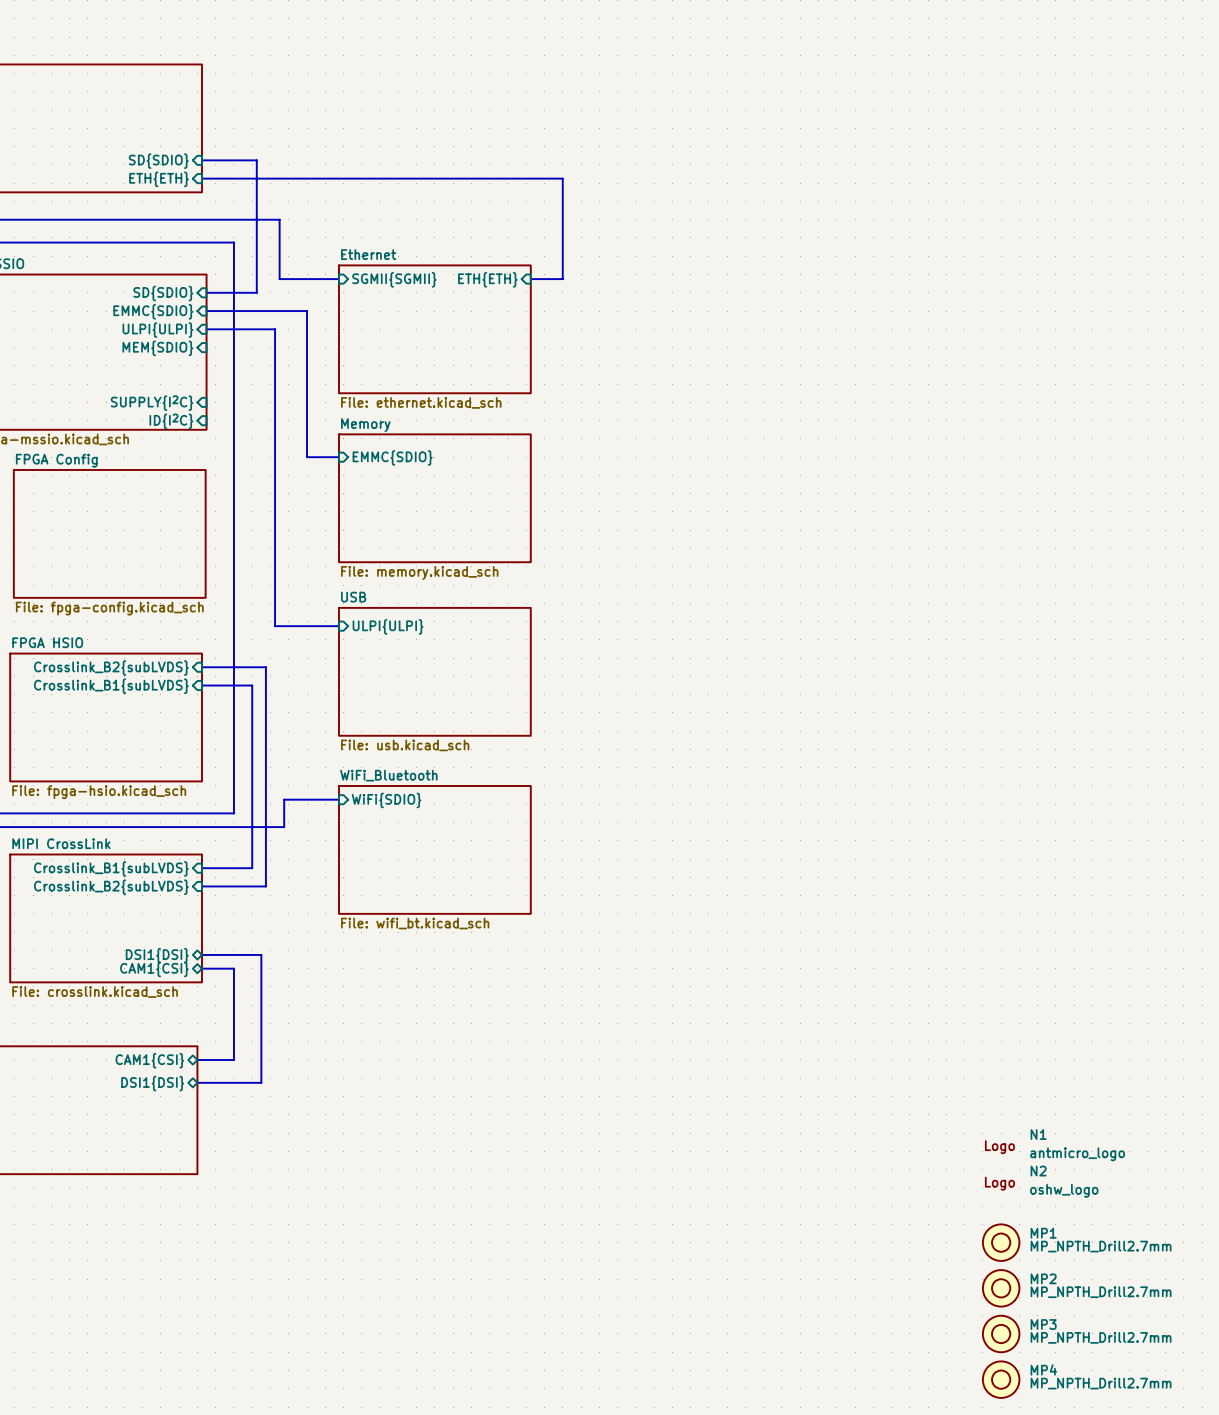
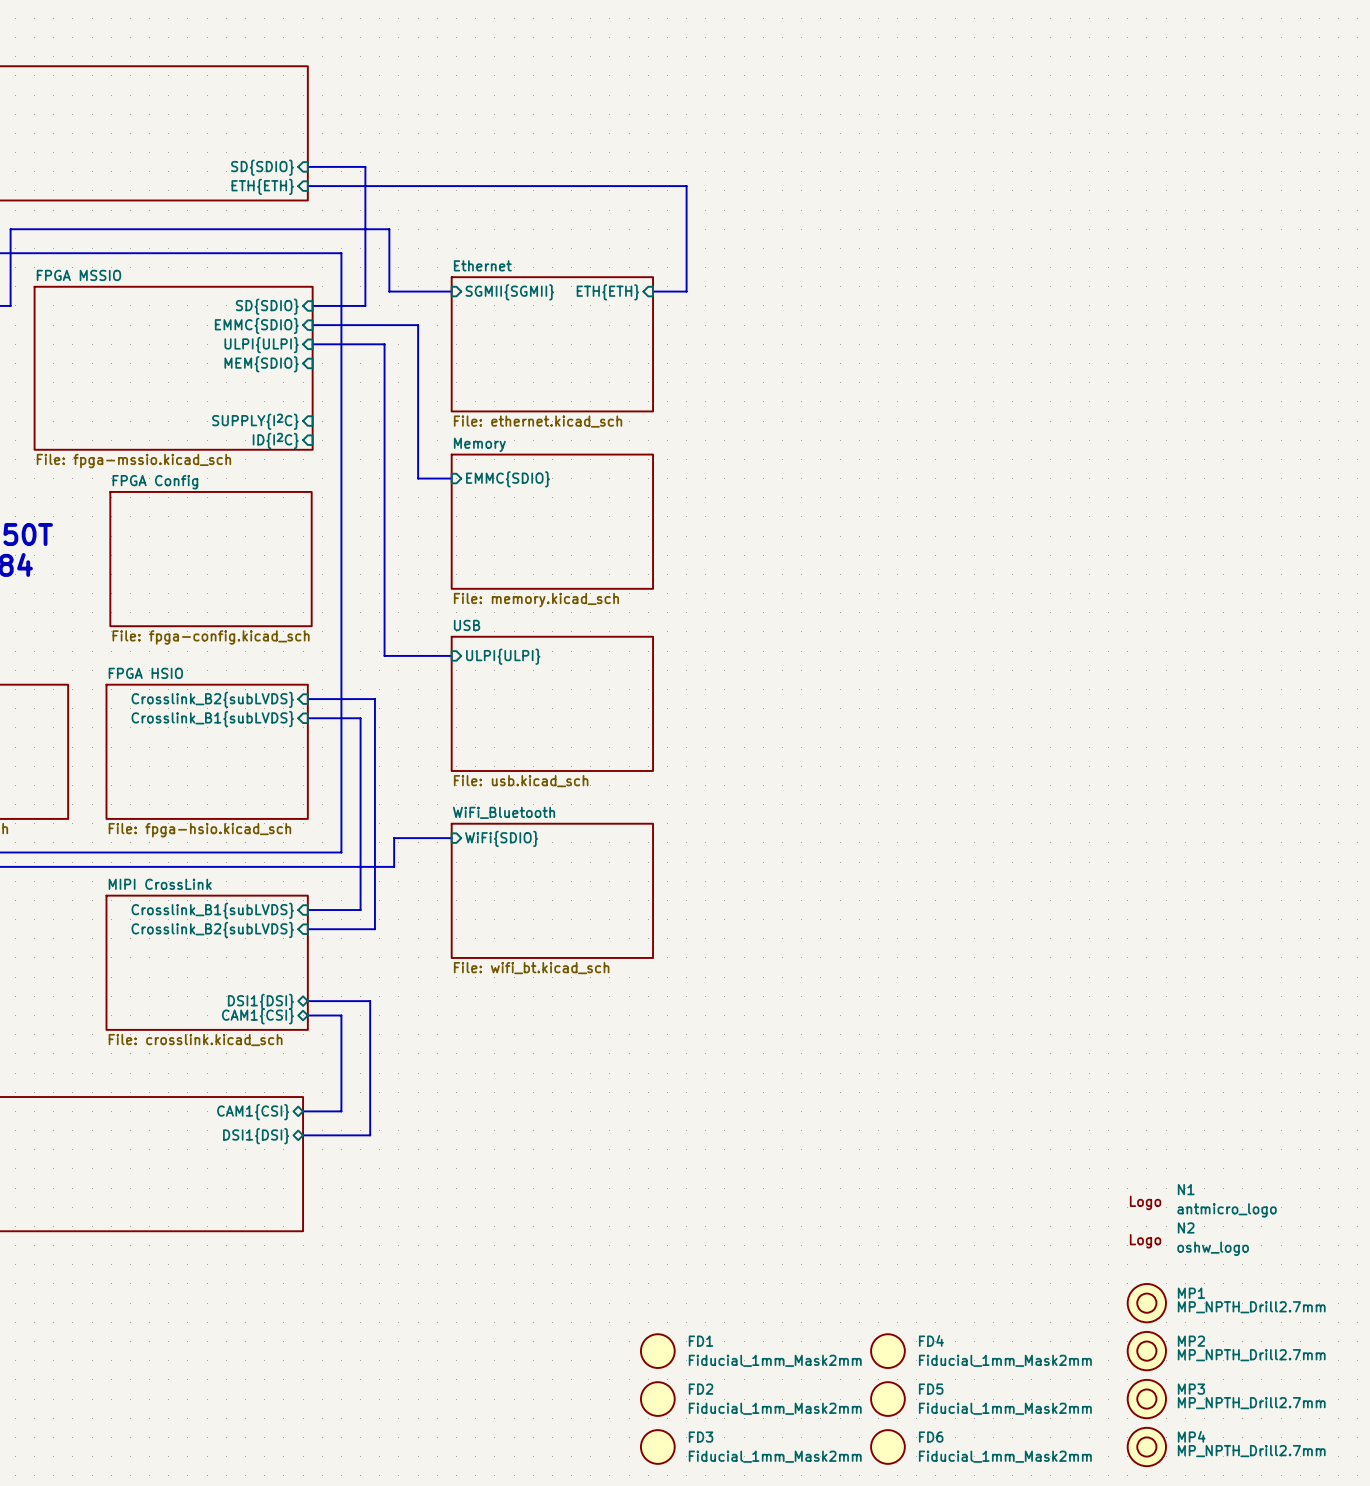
FD1: none -> Fiducial_1mm_Mask2mm (657, 1351)
FD4: none -> Fiducial_1mm_Mask2mm (887, 1351)
FD2: none -> Fiducial_1mm_Mask2mm (657, 1399)
FD5: none -> Fiducial_1mm_Mask2mm (887, 1399)
FD3: none -> Fiducial_1mm_Mask2mm (657, 1446)
FD6: none -> Fiducial_1mm_Mask2mm (887, 1446)

